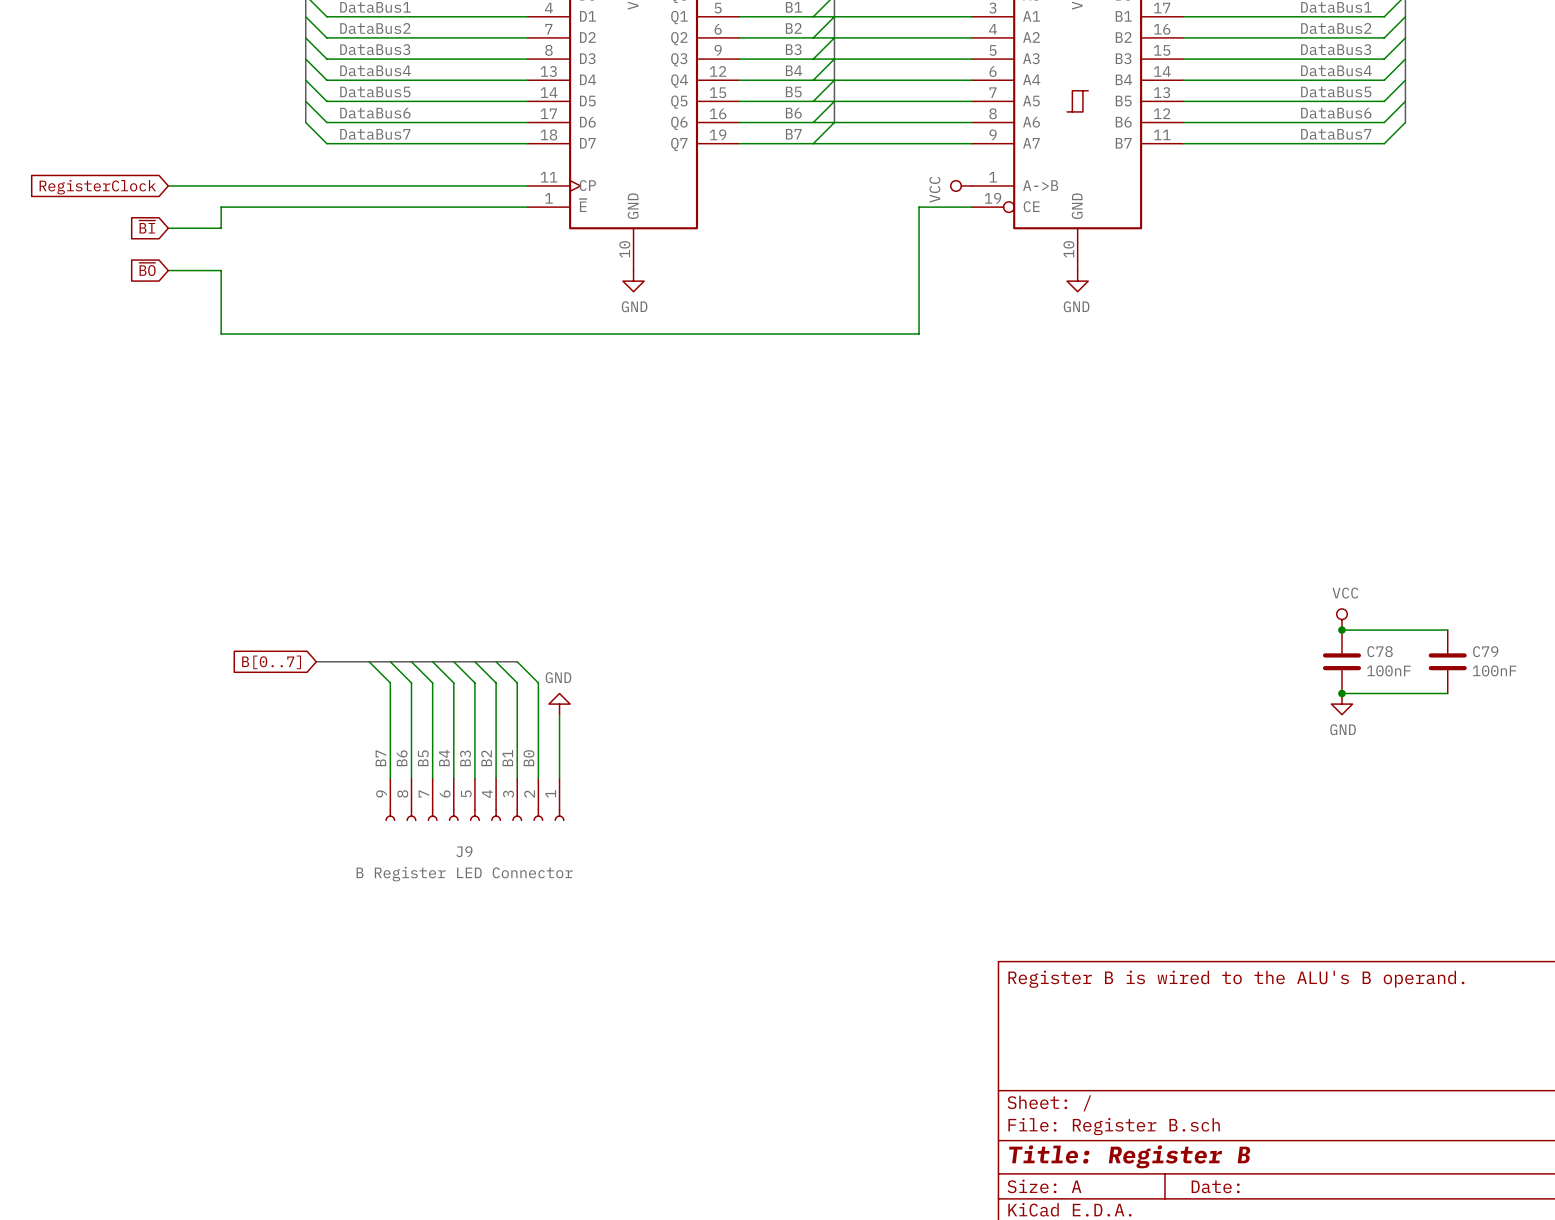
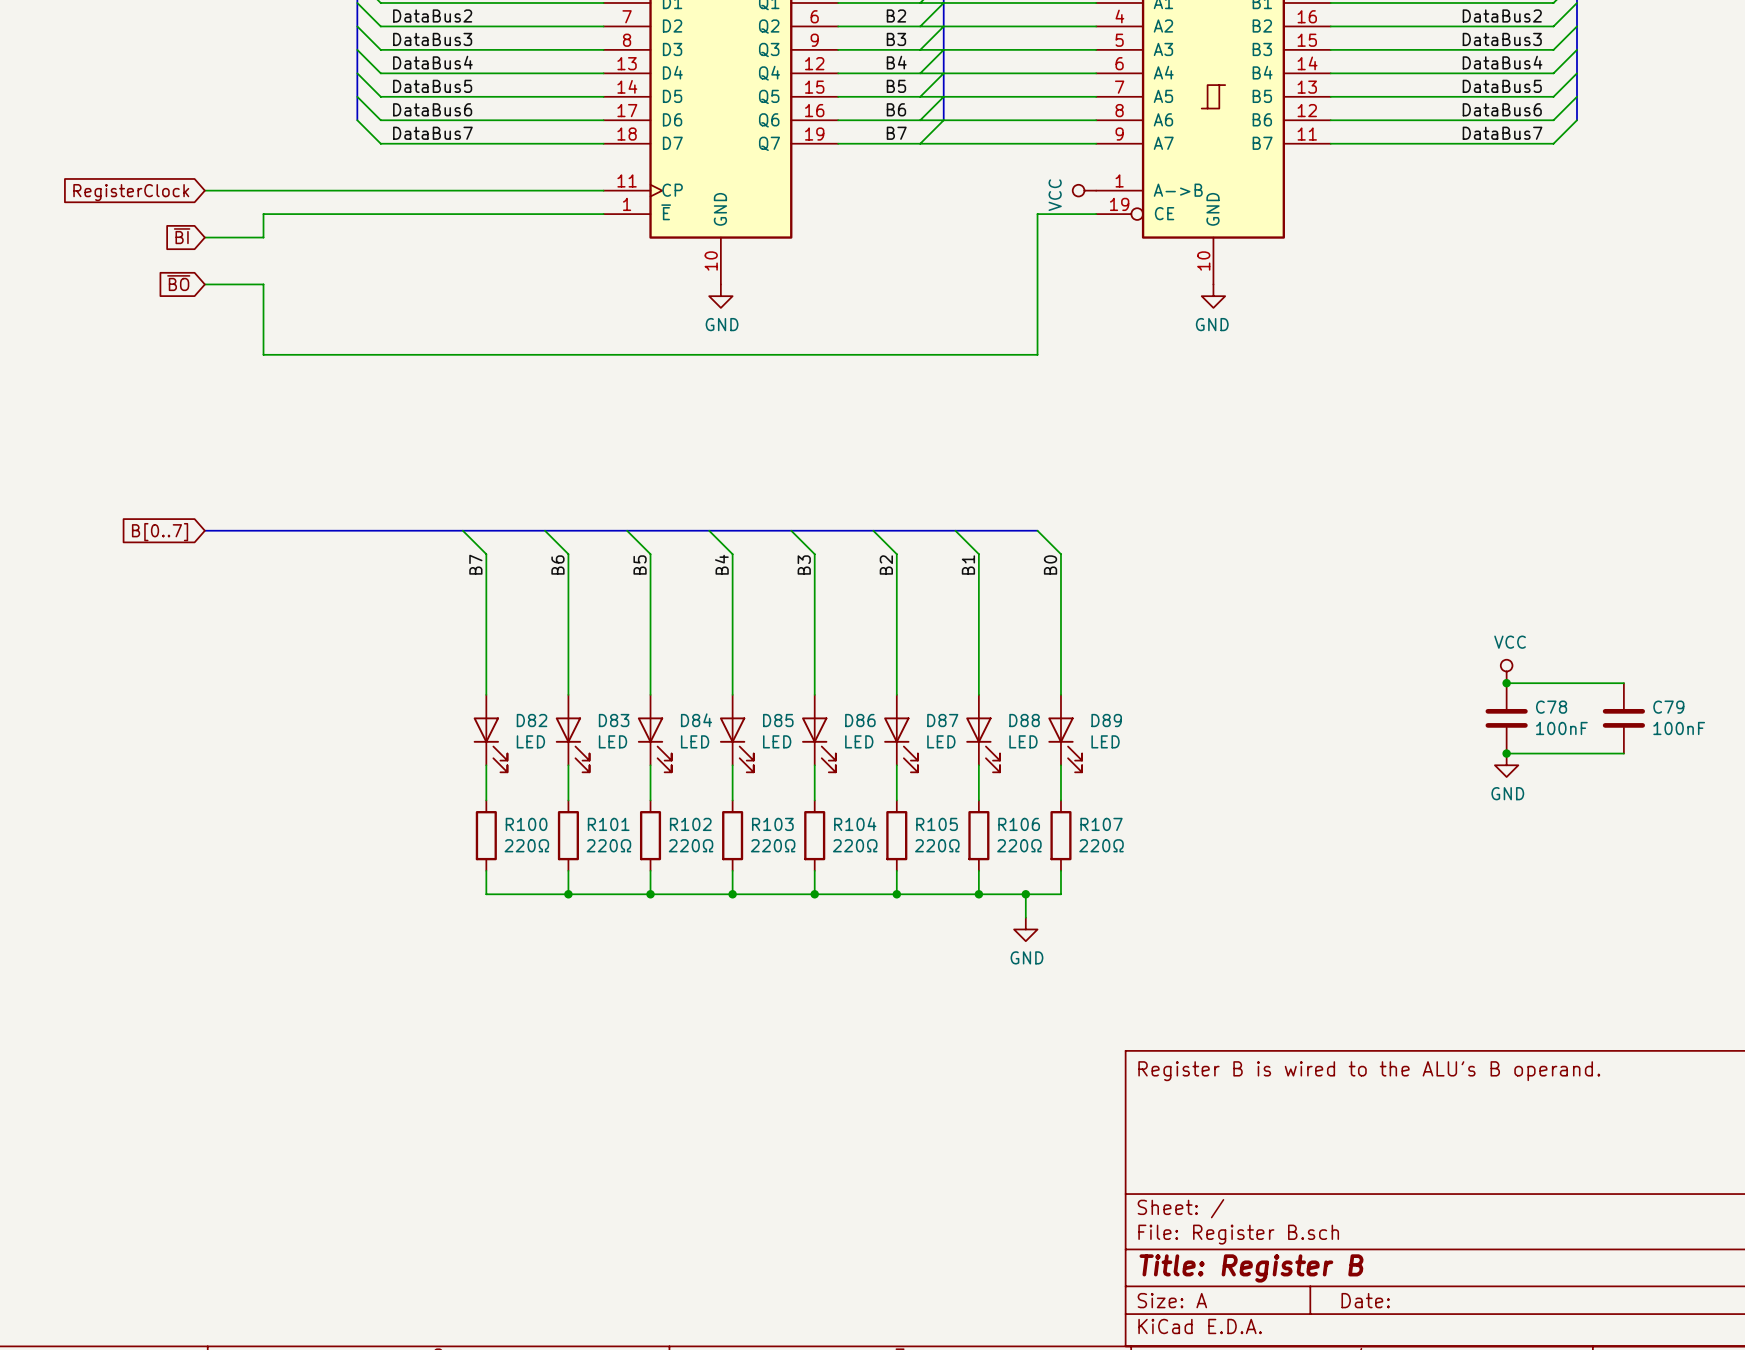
bus: none -> (204, 530) (1037, 530)
wire: none -> (462, 530) (486, 554) (486, 694)
wire: none -> (544, 530) (568, 554) (568, 694)
wire: none -> (627, 530) (650, 554) (650, 694)
wire: none -> (709, 530) (732, 554) (732, 694)
wire: none -> (791, 530) (814, 554) (814, 694)
wire: none -> (873, 530) (896, 554) (896, 694)
wire: none -> (955, 530) (978, 554) (978, 694)
wire: none -> (1037, 530) (1060, 554) (1060, 694)
global label: none -> B[0..7] (160, 532)
label: none -> B7 (475, 564)
label: none -> B6 (557, 564)
label: none -> B5 (640, 564)
label: none -> B4 (721, 564)
label: none -> B3 (804, 564)
label: none -> B2 (886, 564)
label: none -> B1 (968, 564)
label: none -> B0 (1050, 564)
bus: (316, 661) (517, 661) -> none
wire: (369, 661) (390, 682) (390, 778) -> none
wire: (390, 661) (411, 682) (411, 778) -> none
wire: (411, 661) (432, 682) (432, 778) -> none
wire: (432, 661) (453, 682) (453, 778) -> none
wire: (453, 661) (474, 682) (474, 778) -> none
wire: (474, 661) (496, 682) (496, 704) -> none
wire: (496, 661) (517, 682) (517, 778) -> none
wire: (517, 661) (538, 682) (538, 778) -> none
global label: B[0..7] (271, 662) -> none
D82: none -> LED (490, 733)
D83: none -> LED (572, 733)
D84: none -> LED (654, 733)
D85: none -> LED (736, 733)
D86: none -> LED (818, 733)
D87: none -> LED (901, 733)
D88: none -> LED (983, 733)
D89: none -> LED (1065, 733)
wire: none -> (486, 765) (486, 800)
power symbol: GND (559, 704) -> none
wire: none -> (650, 765) (650, 800)
wire: none -> (732, 765) (732, 800)
wire: none -> (814, 765) (814, 800)
wire: none -> (896, 765) (896, 800)
wire: none -> (978, 765) (978, 800)
wire: none -> (1060, 765) (1060, 800)
wire: (559, 714) (559, 778) -> none
wire: (496, 735) (496, 778) -> none
label: B7 (380, 758) -> none
label: B6 (402, 758) -> none
label: B5 (423, 758) -> none
label: B4 (444, 758) -> none
label: B3 (465, 758) -> none
label: B2 (486, 758) -> none
label: B1 (507, 758) -> none
label: B0 (528, 758) -> none
R100: none -> 220Ω (486, 835)
R101: none -> 220Ω (568, 835)
R102: none -> 220Ω (650, 835)
R103: none -> 220Ω (732, 835)
R104: none -> 220Ω (814, 835)
R105: none -> 220Ω (896, 835)
R106: none -> 220Ω (978, 835)
R107: none -> 220Ω (1060, 835)
wire: none -> (486, 870) (486, 894) (1060, 894) (1060, 870)
J9: B Register LED Connector (474, 799) -> none
wire: none -> (650, 870) (650, 894)
wire: none -> (732, 870) (732, 894)
wire: none -> (814, 870) (814, 894)
wire: none -> (896, 870) (896, 894)
wire: none -> (978, 870) (978, 894)
junction: none -> (568, 894)
junction: none -> (650, 894)
junction: none -> (732, 894)
junction: none -> (814, 894)
junction: none -> (896, 894)
junction: none -> (978, 894)
wire: none -> (1025, 894) (1025, 917)
junction: none -> (1025, 894)
power symbol: none -> GND (1025, 929)

